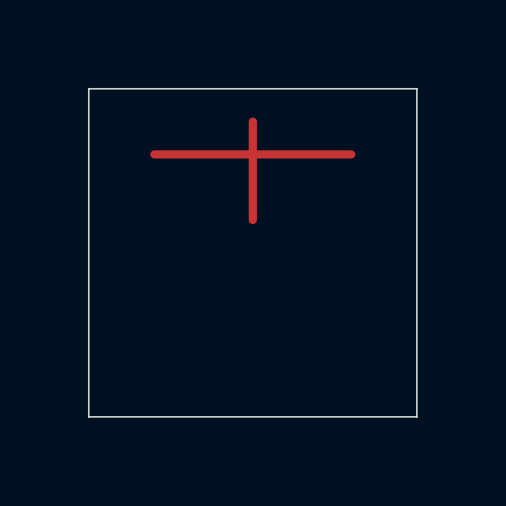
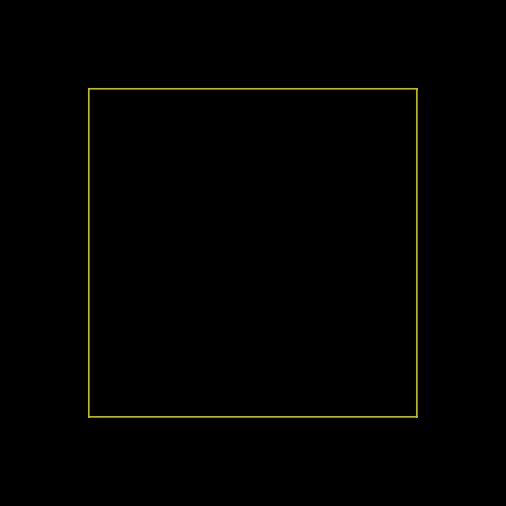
track: (252, 121) (252, 220) -> none
track: (154, 154) (351, 154) -> none

